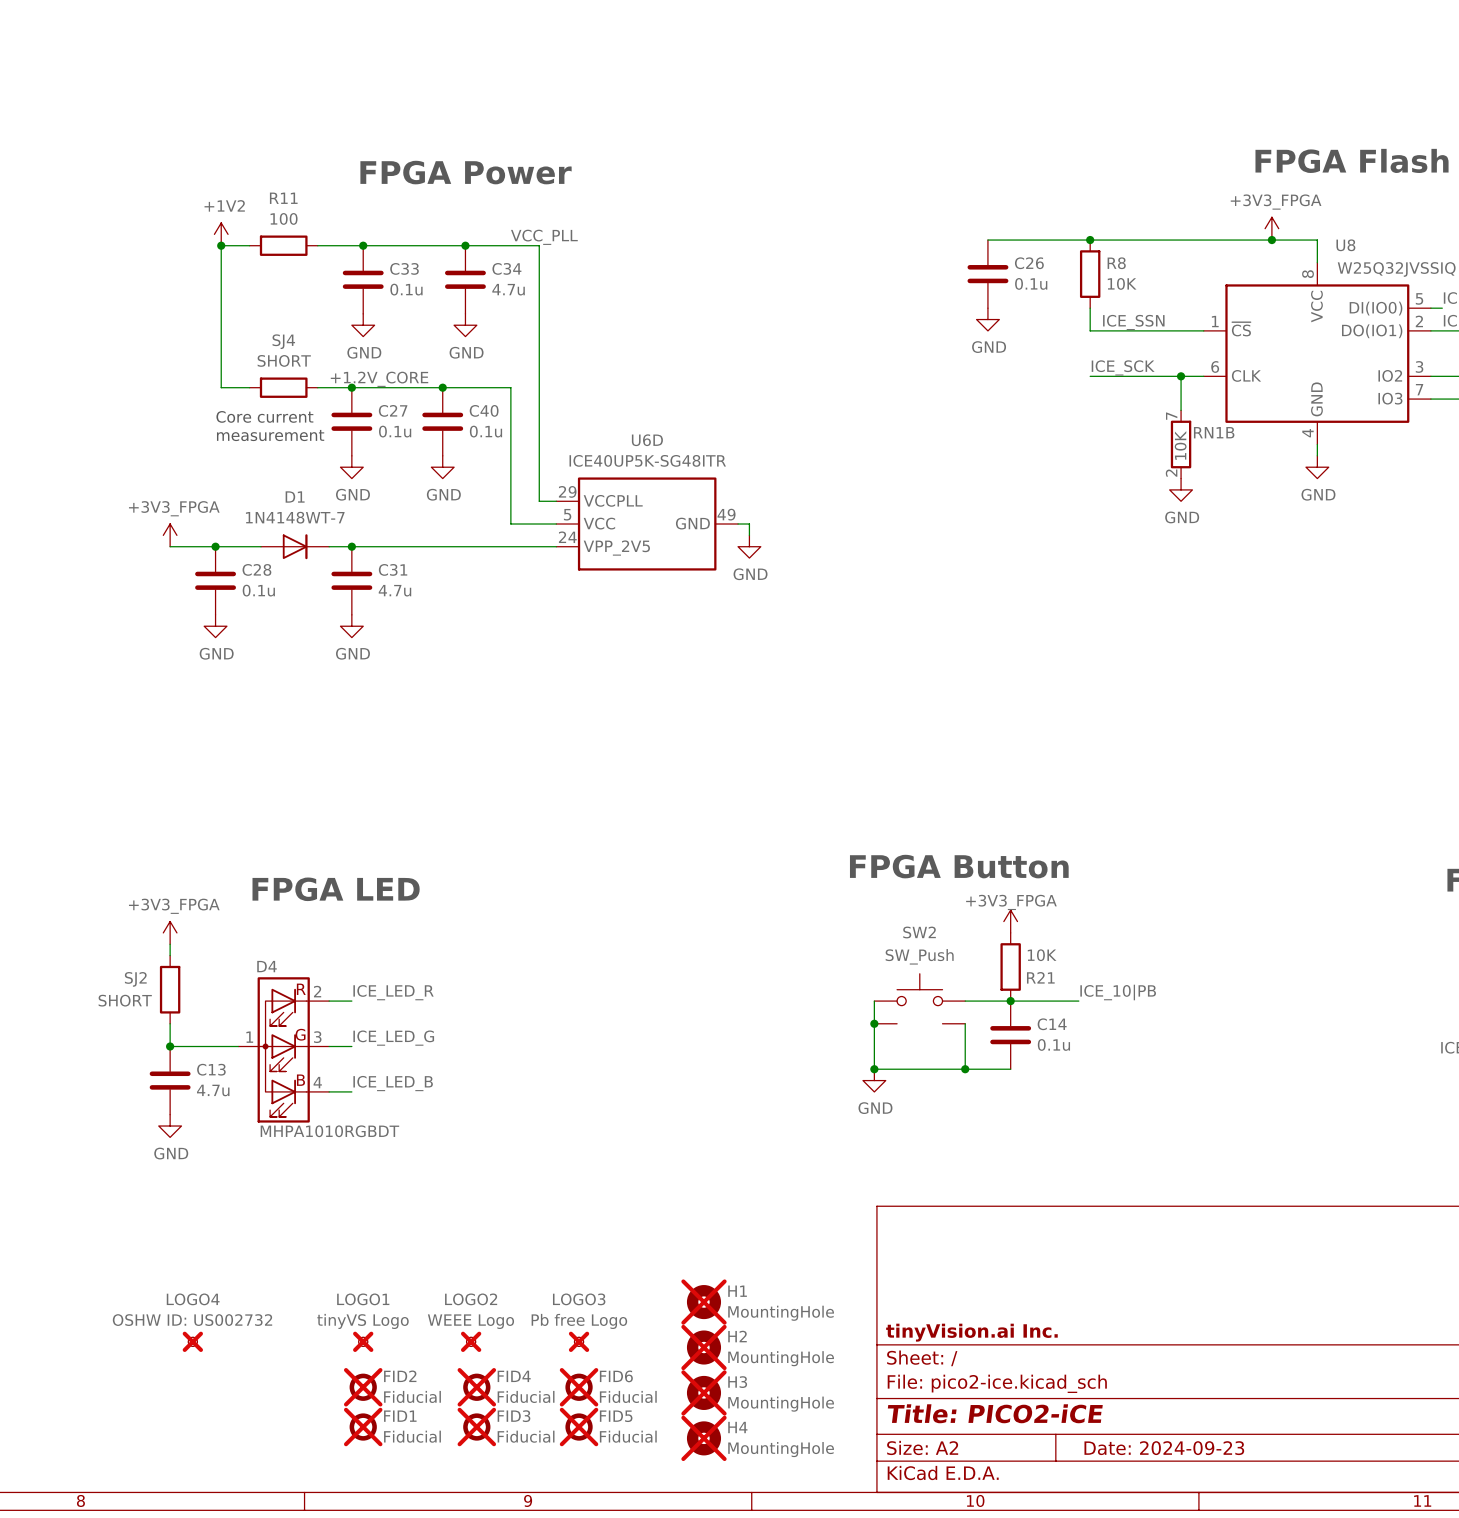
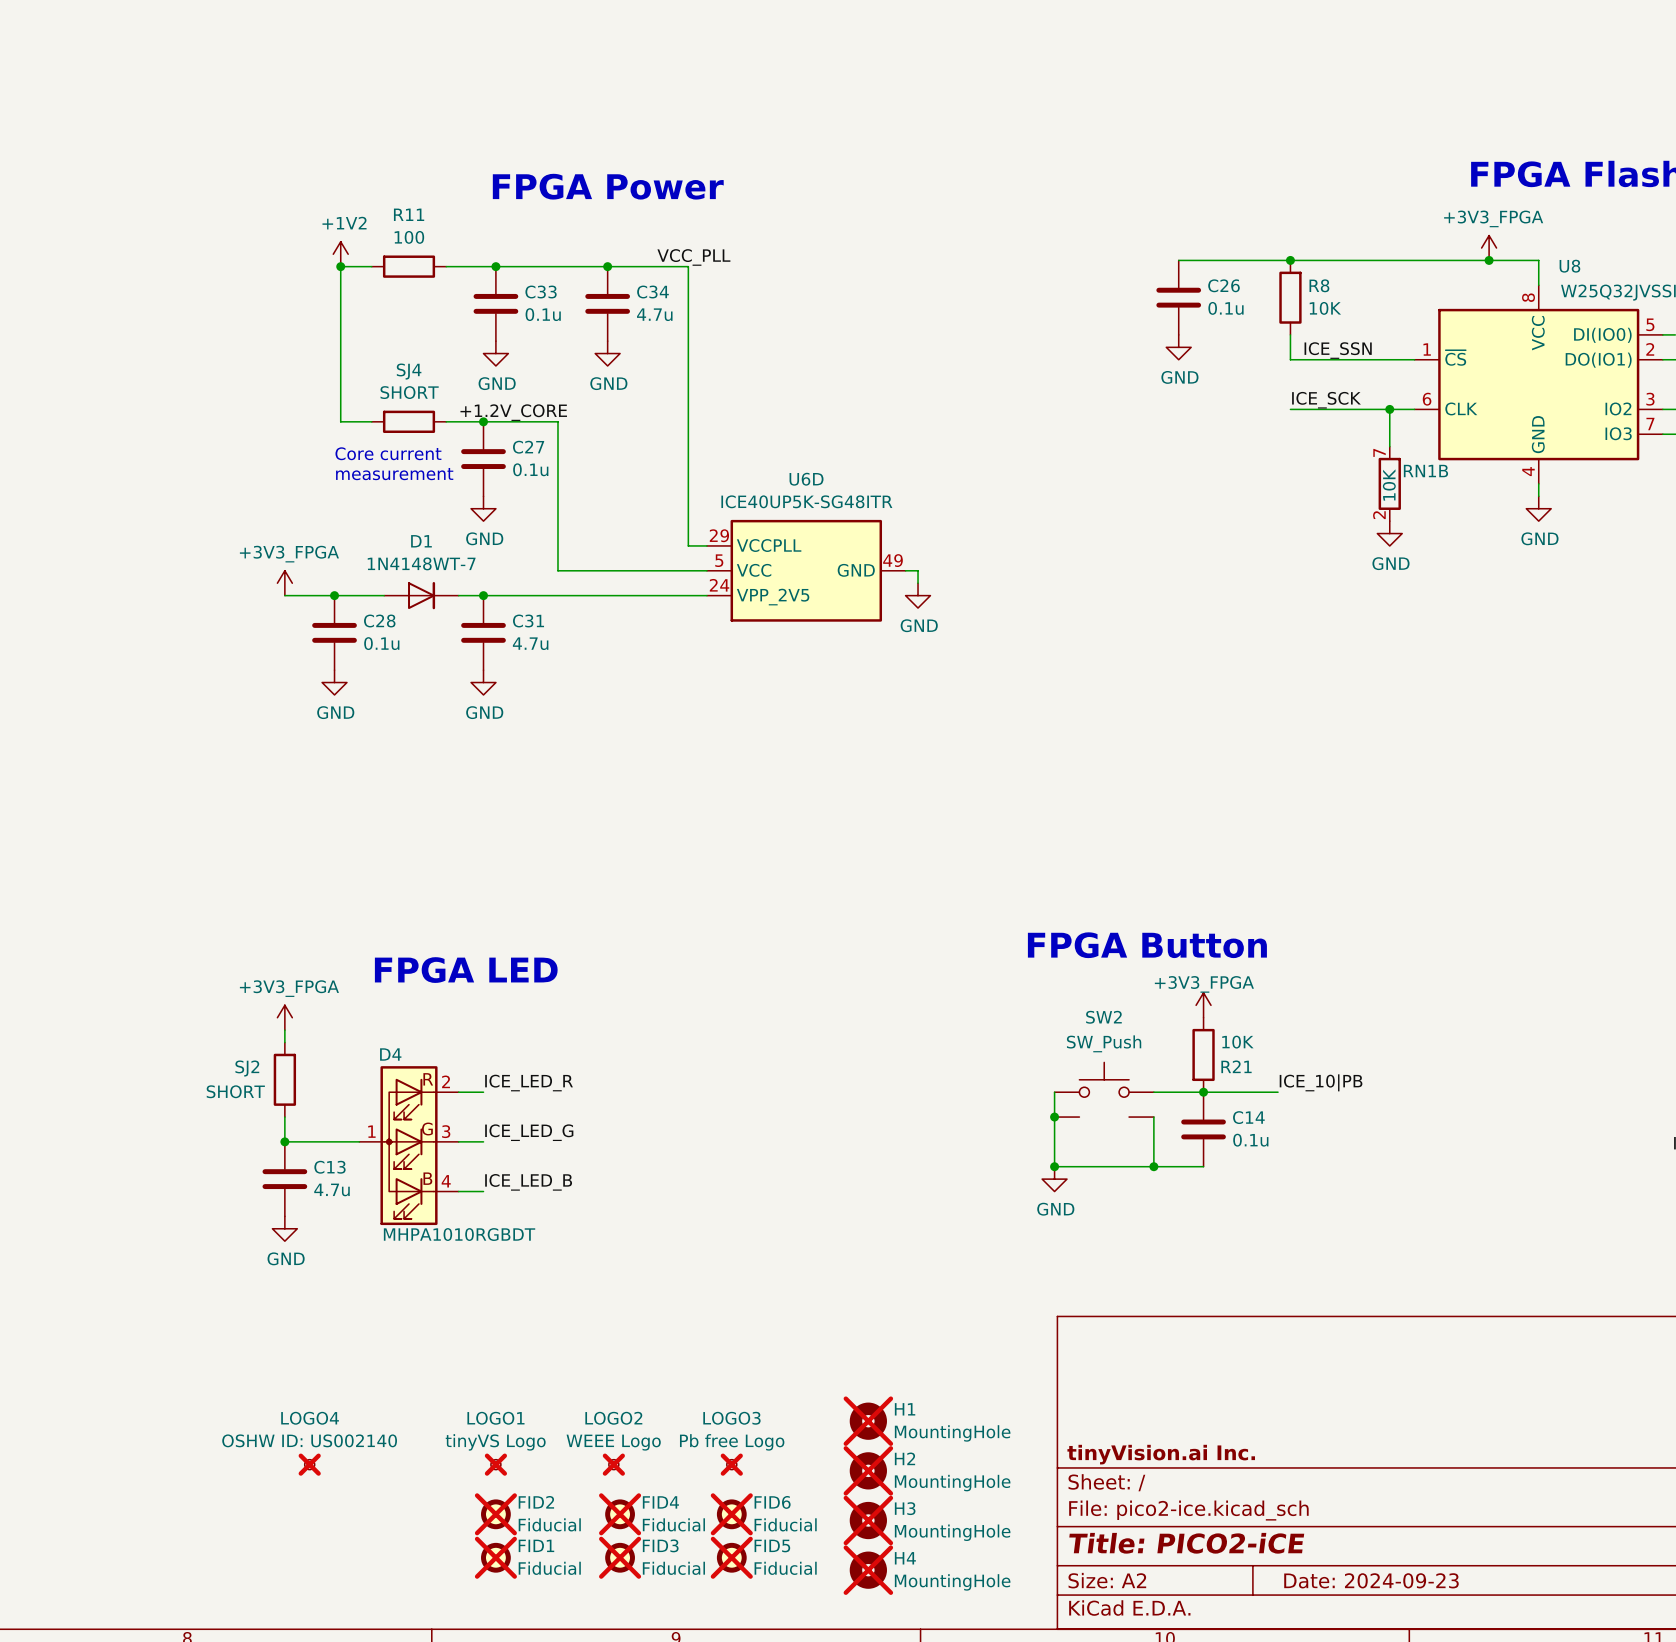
wire: (420, 387) (510, 387) (510, 524) -> (557, 421) (557, 570) (657, 570)
junction: (442, 387) -> none
C40: 0.1u (442, 421) -> none
power symbol: GND (442, 467) -> none
LOGO4 value: OSHW ID: US002732 (192, 1320) -> OSHW ID: US002140 (309, 1440)

